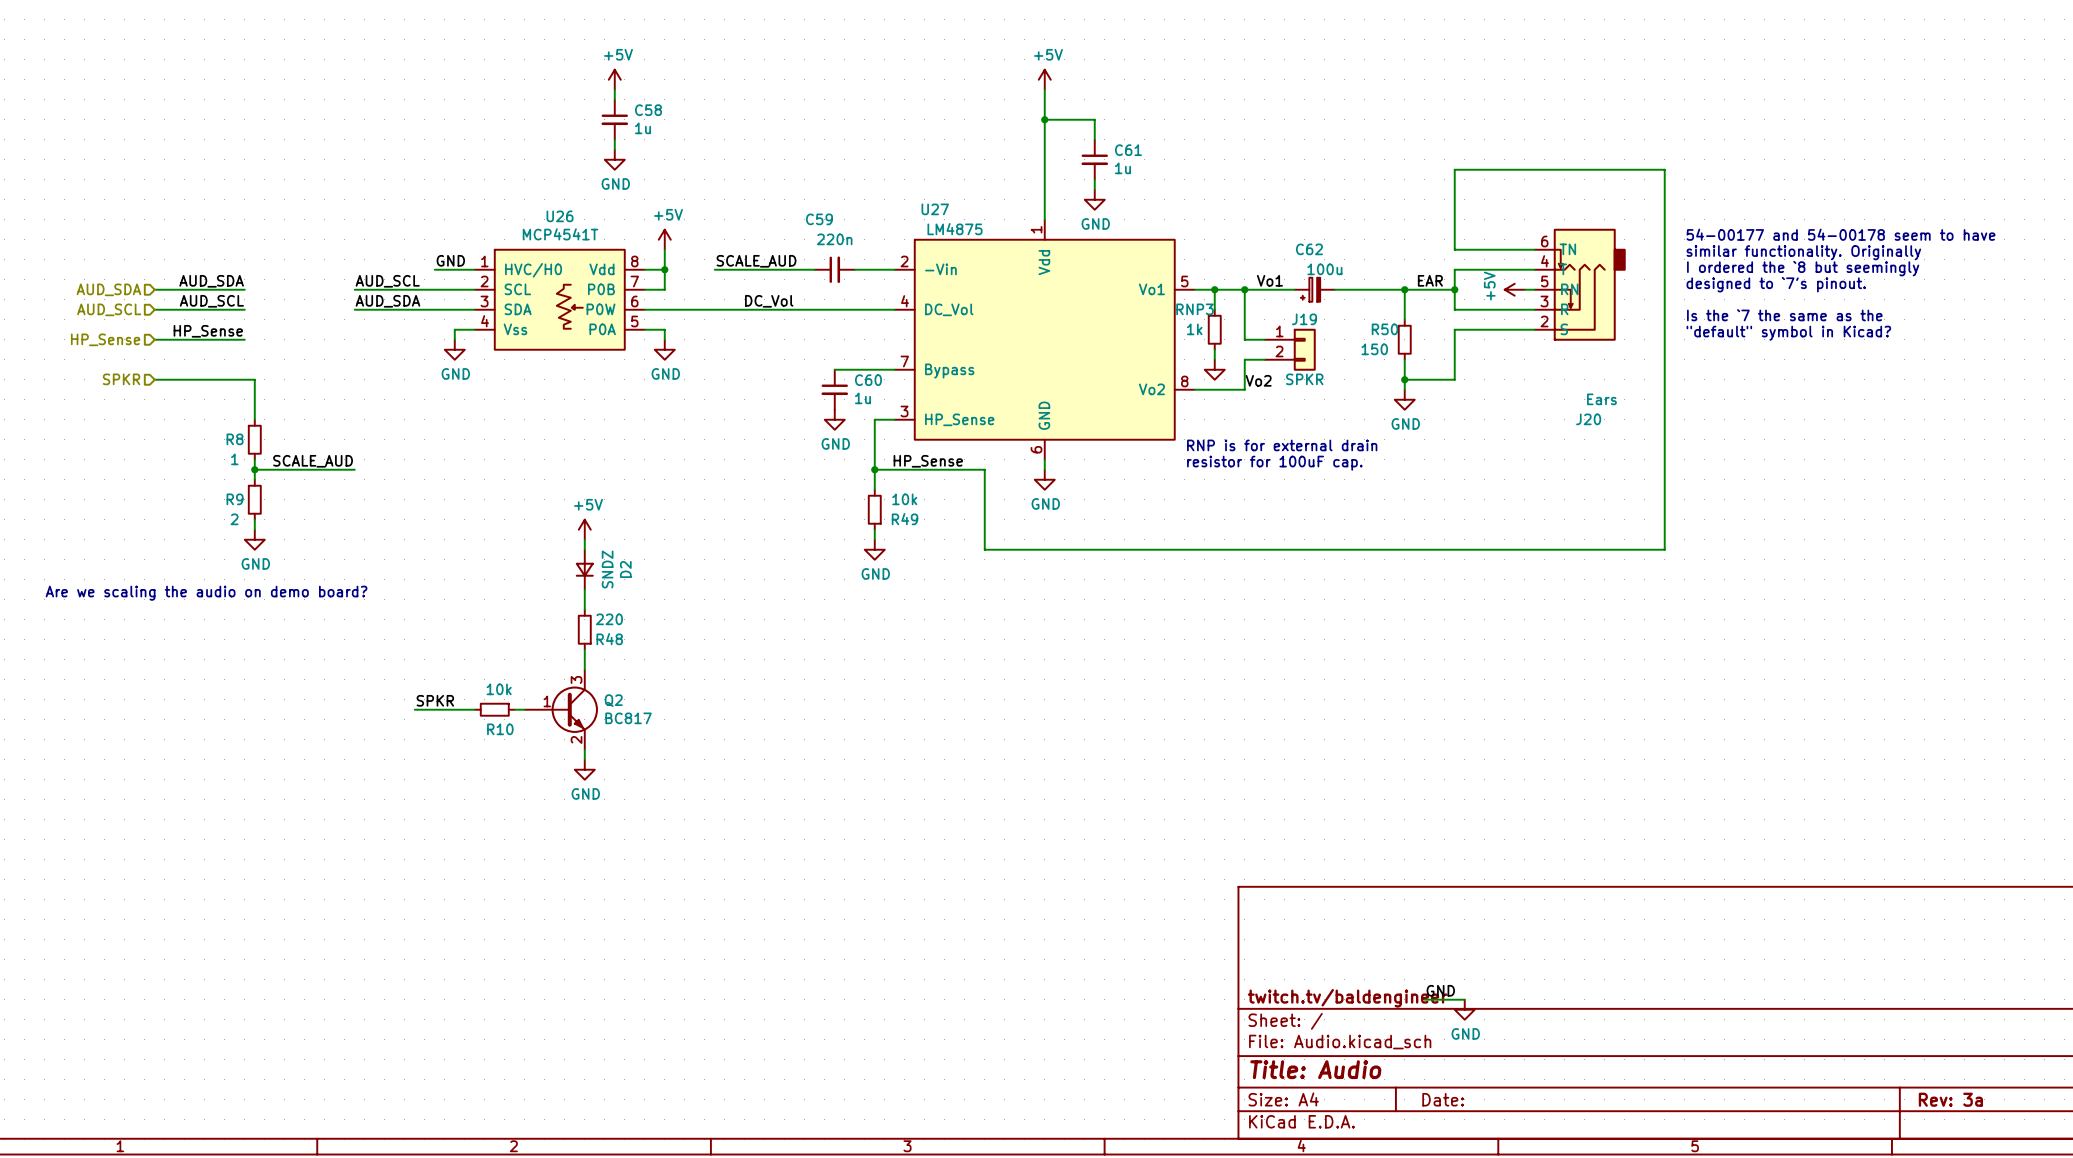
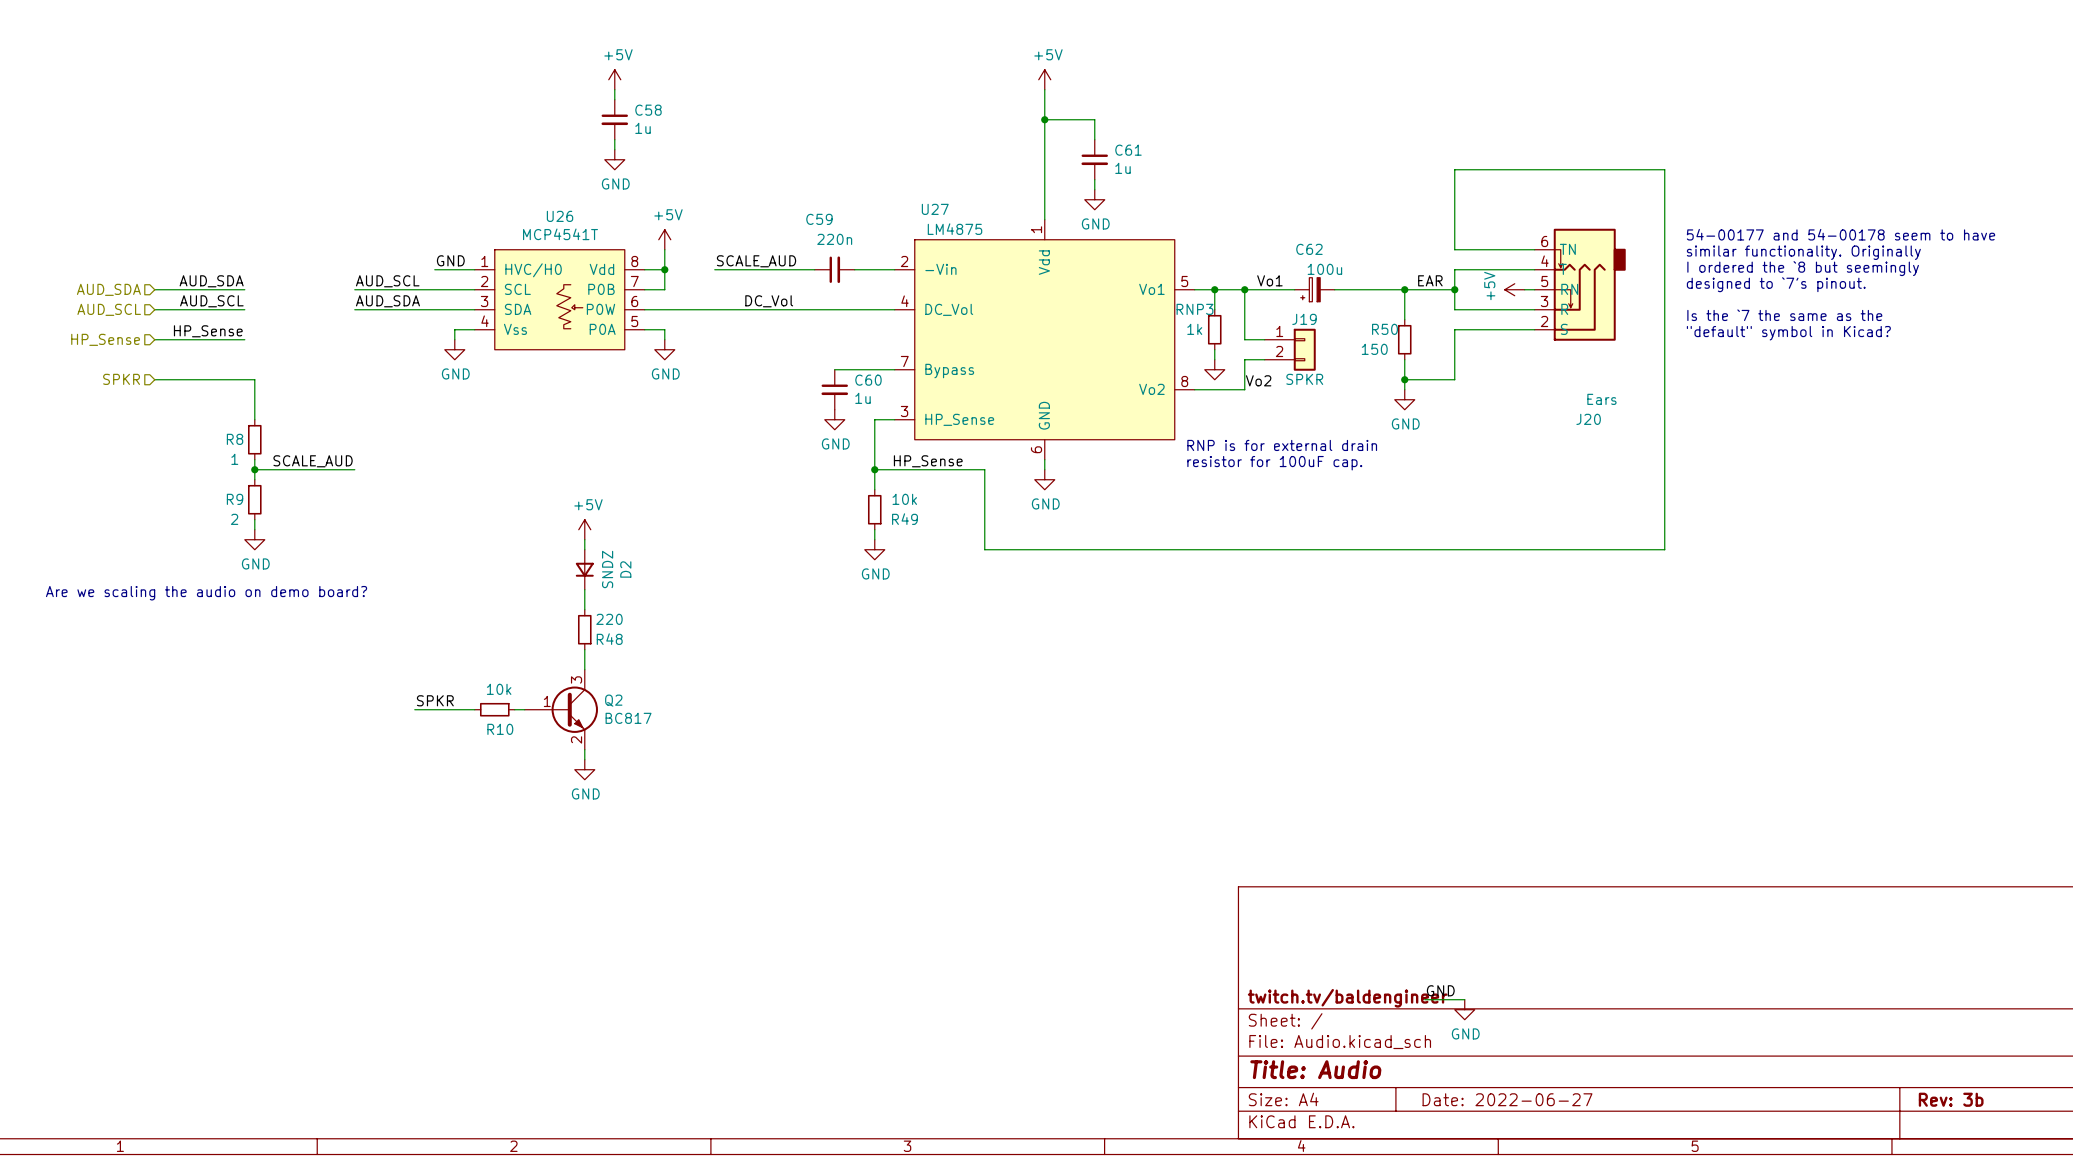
title block: Date: (1443, 1099) -> Date: 2022-06-27 (1507, 1099)
title block: Rev: 3a (1950, 1099) -> Rev: 3b (1951, 1099)

